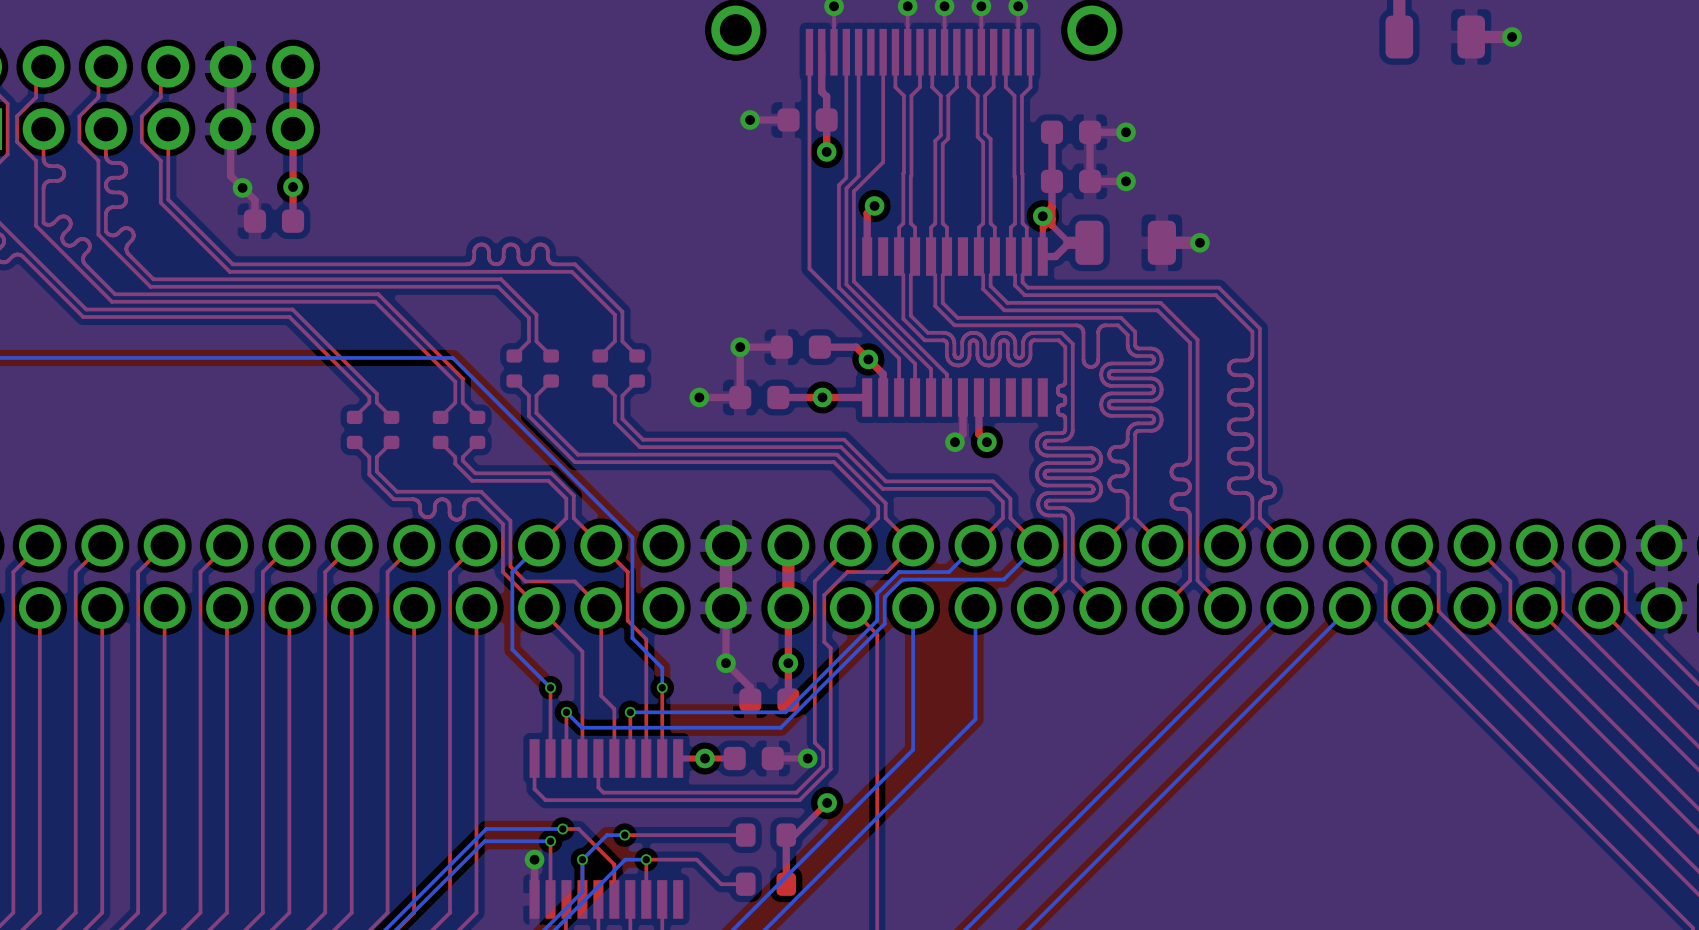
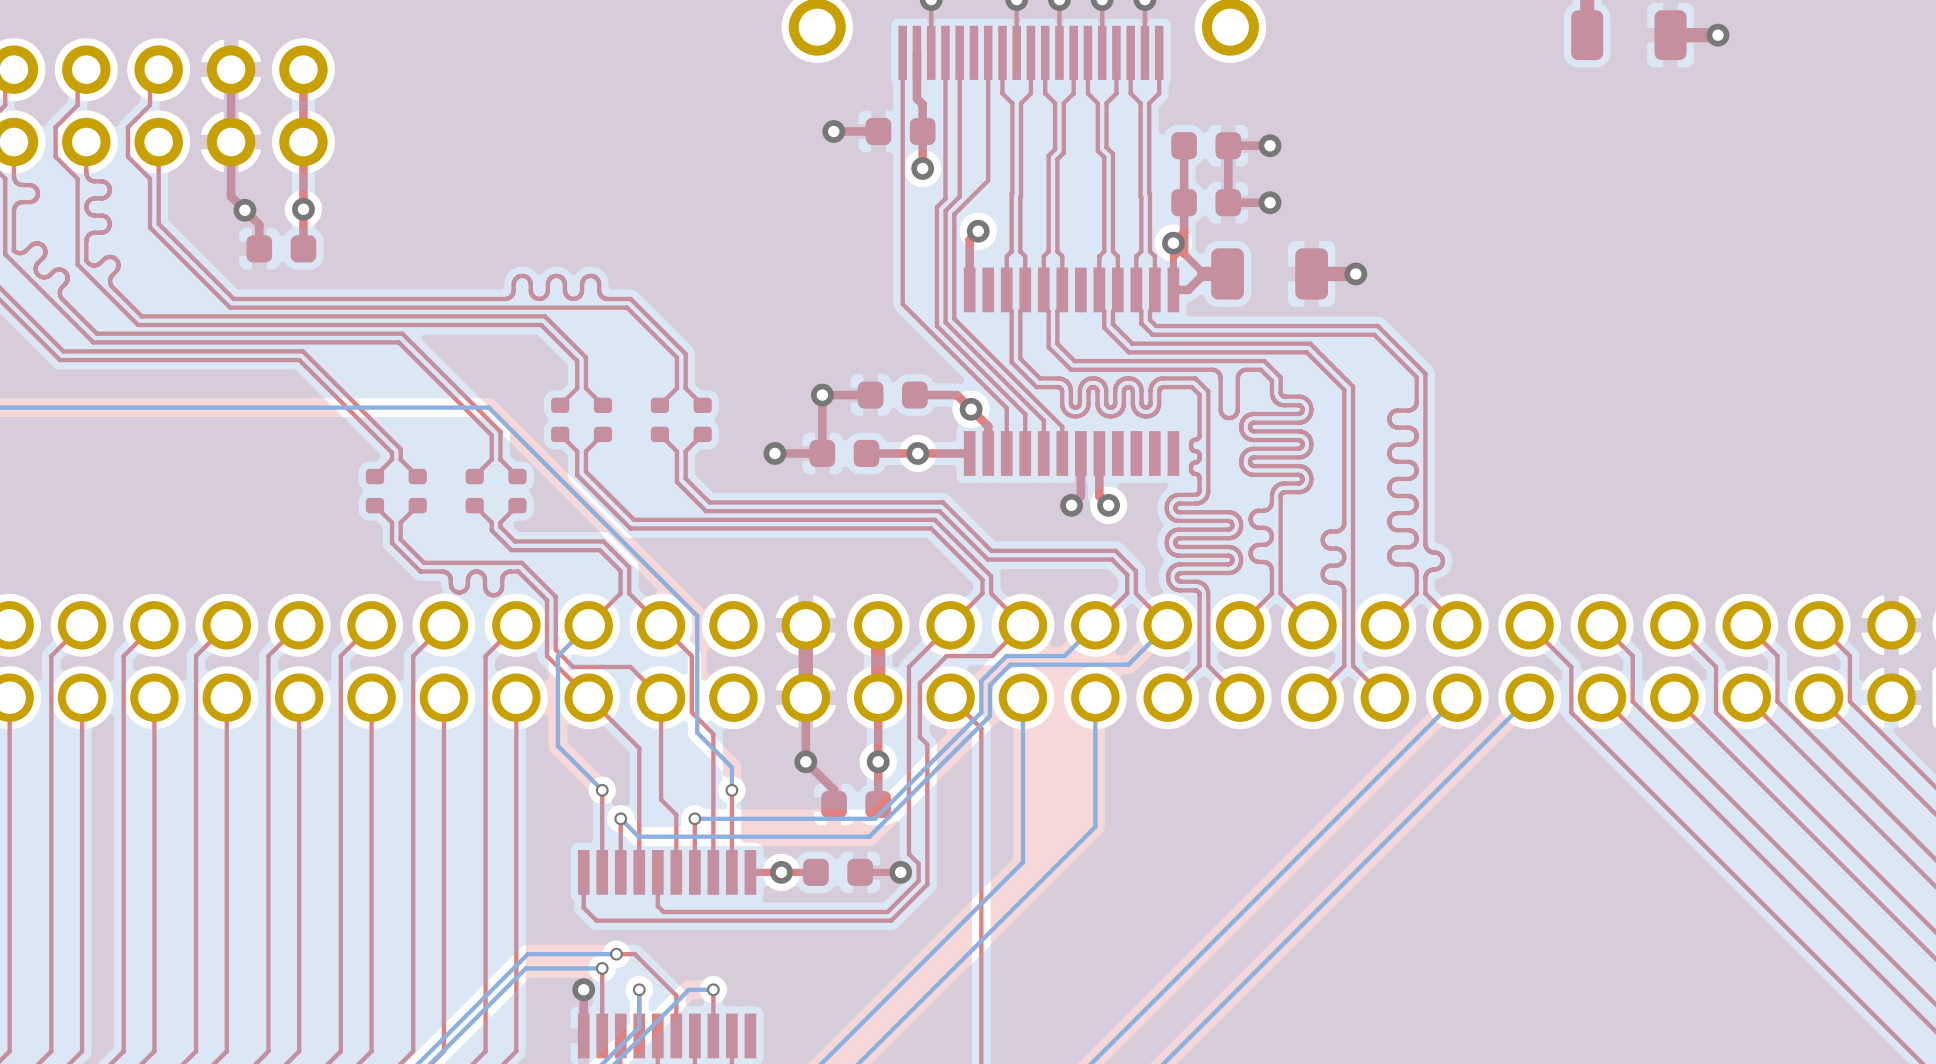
top track: (827, 802) (794, 835) (786, 835) (786, 884) -> none
via: (827, 802) -> none
bottom track: (624, 835) (607, 835) (582, 859) -> none
via: (624, 835) -> none
top track: (745, 835) (624, 835) -> none
part: (766, 835) -> none
top track: (646, 859) (696, 859) (721, 884) (745, 884) -> none
part: (766, 884) -> none

